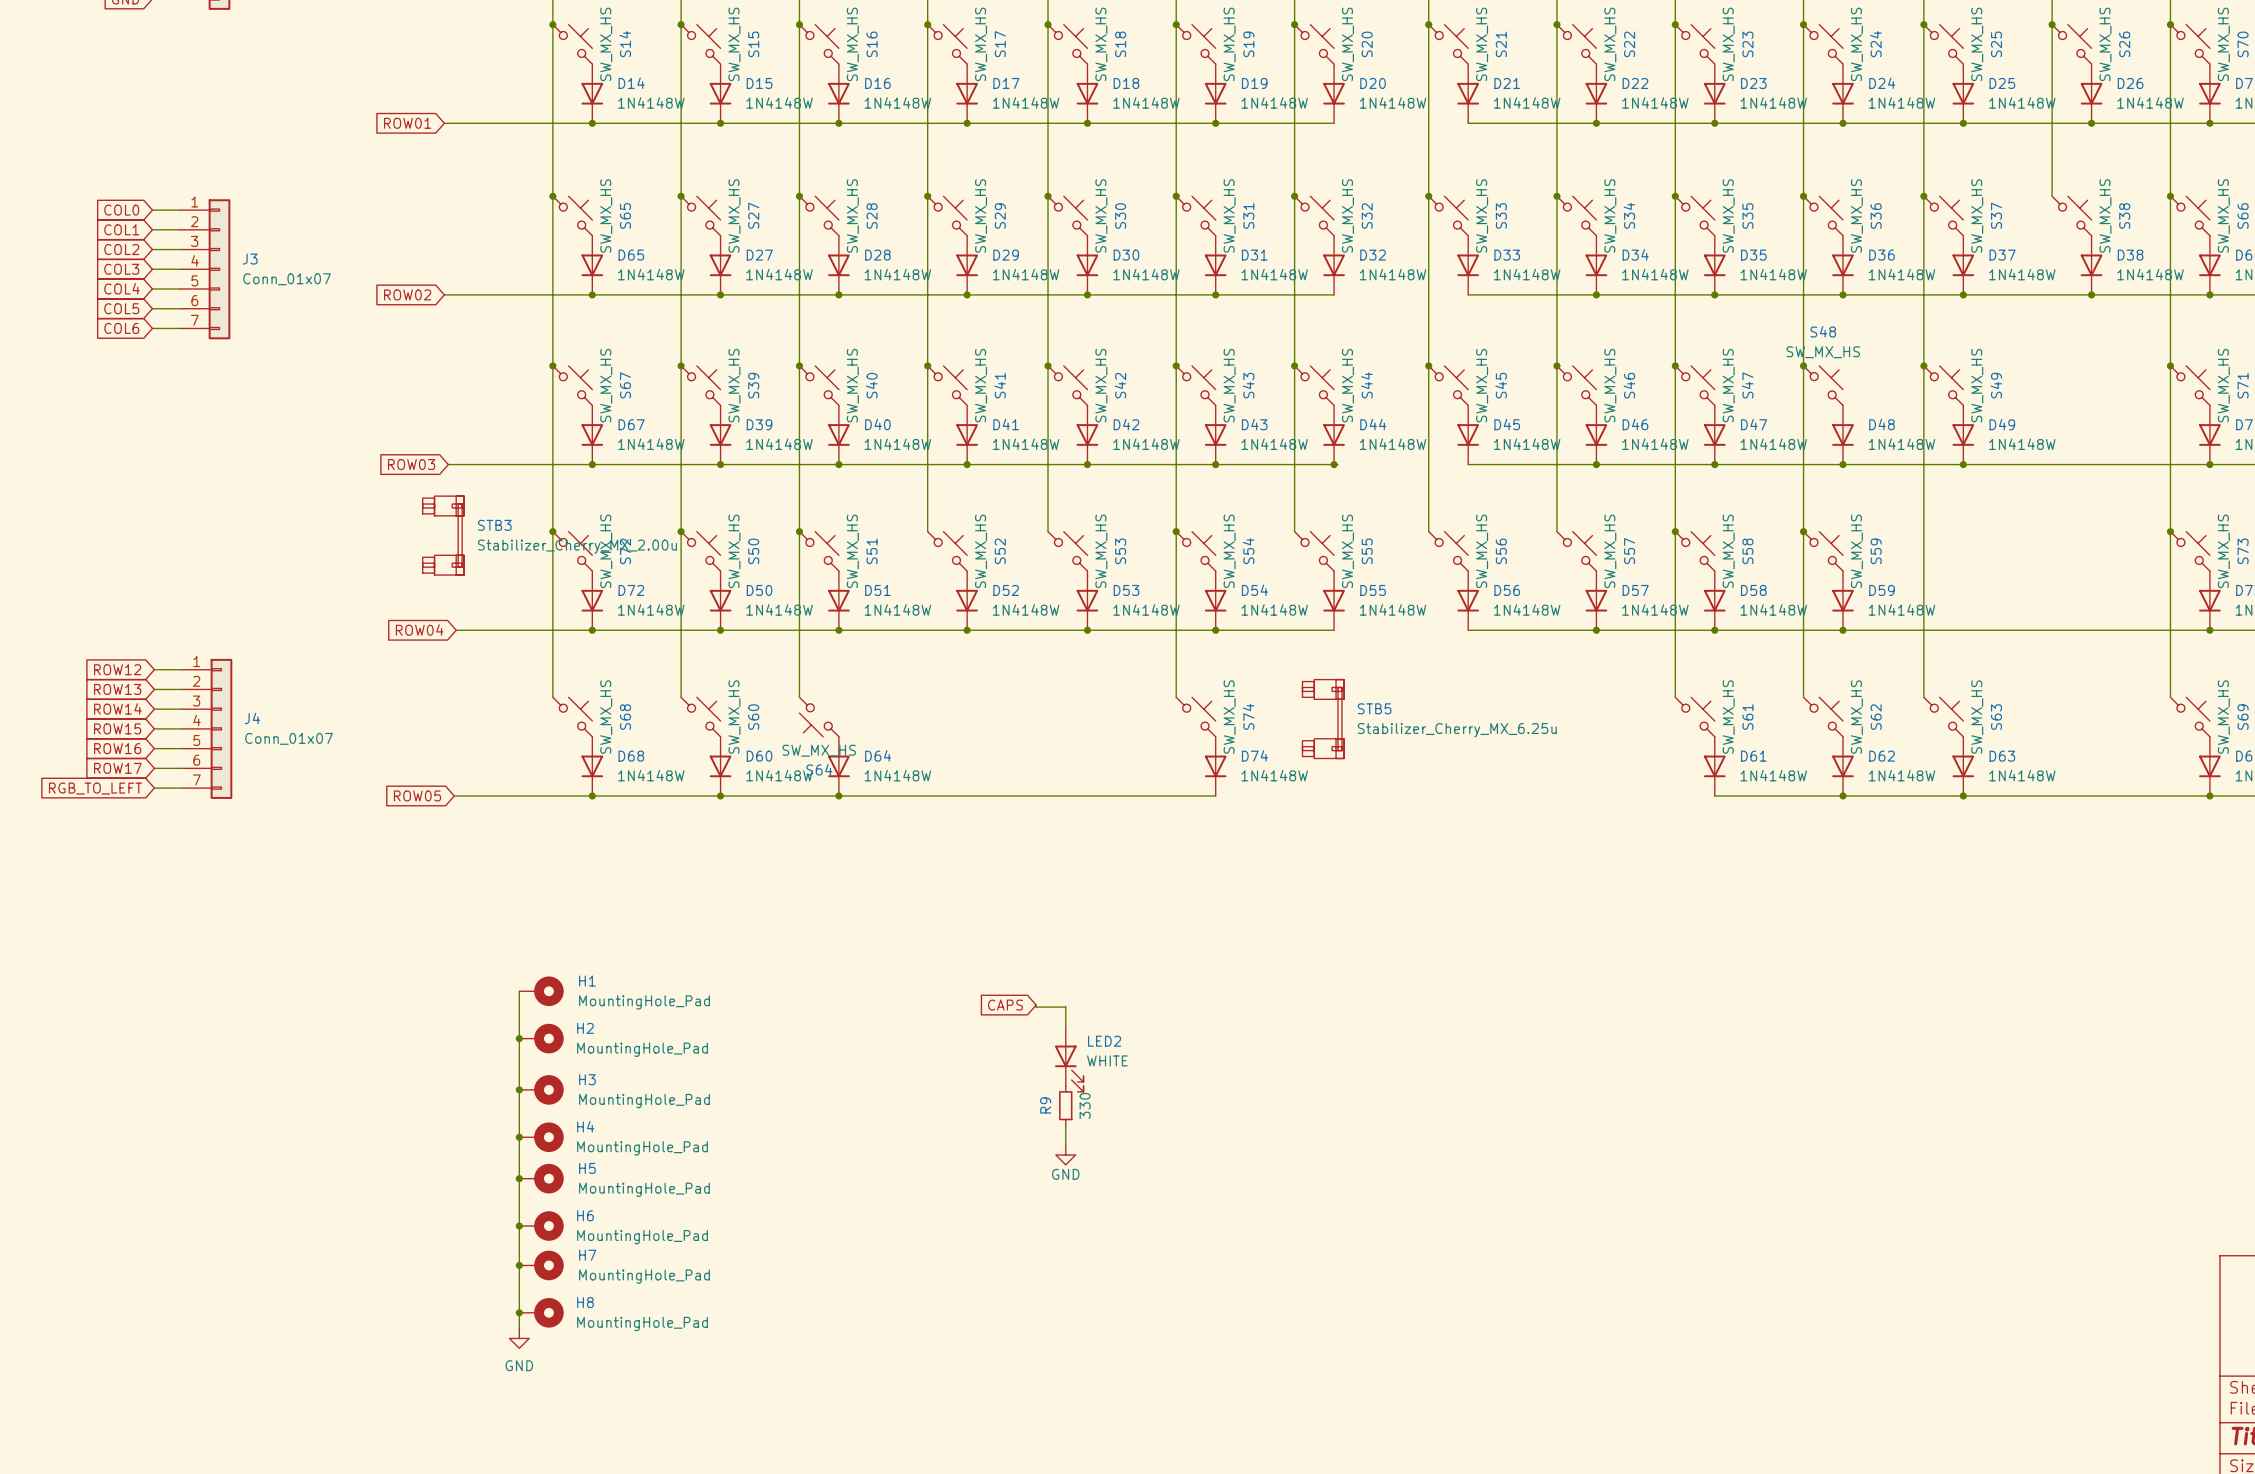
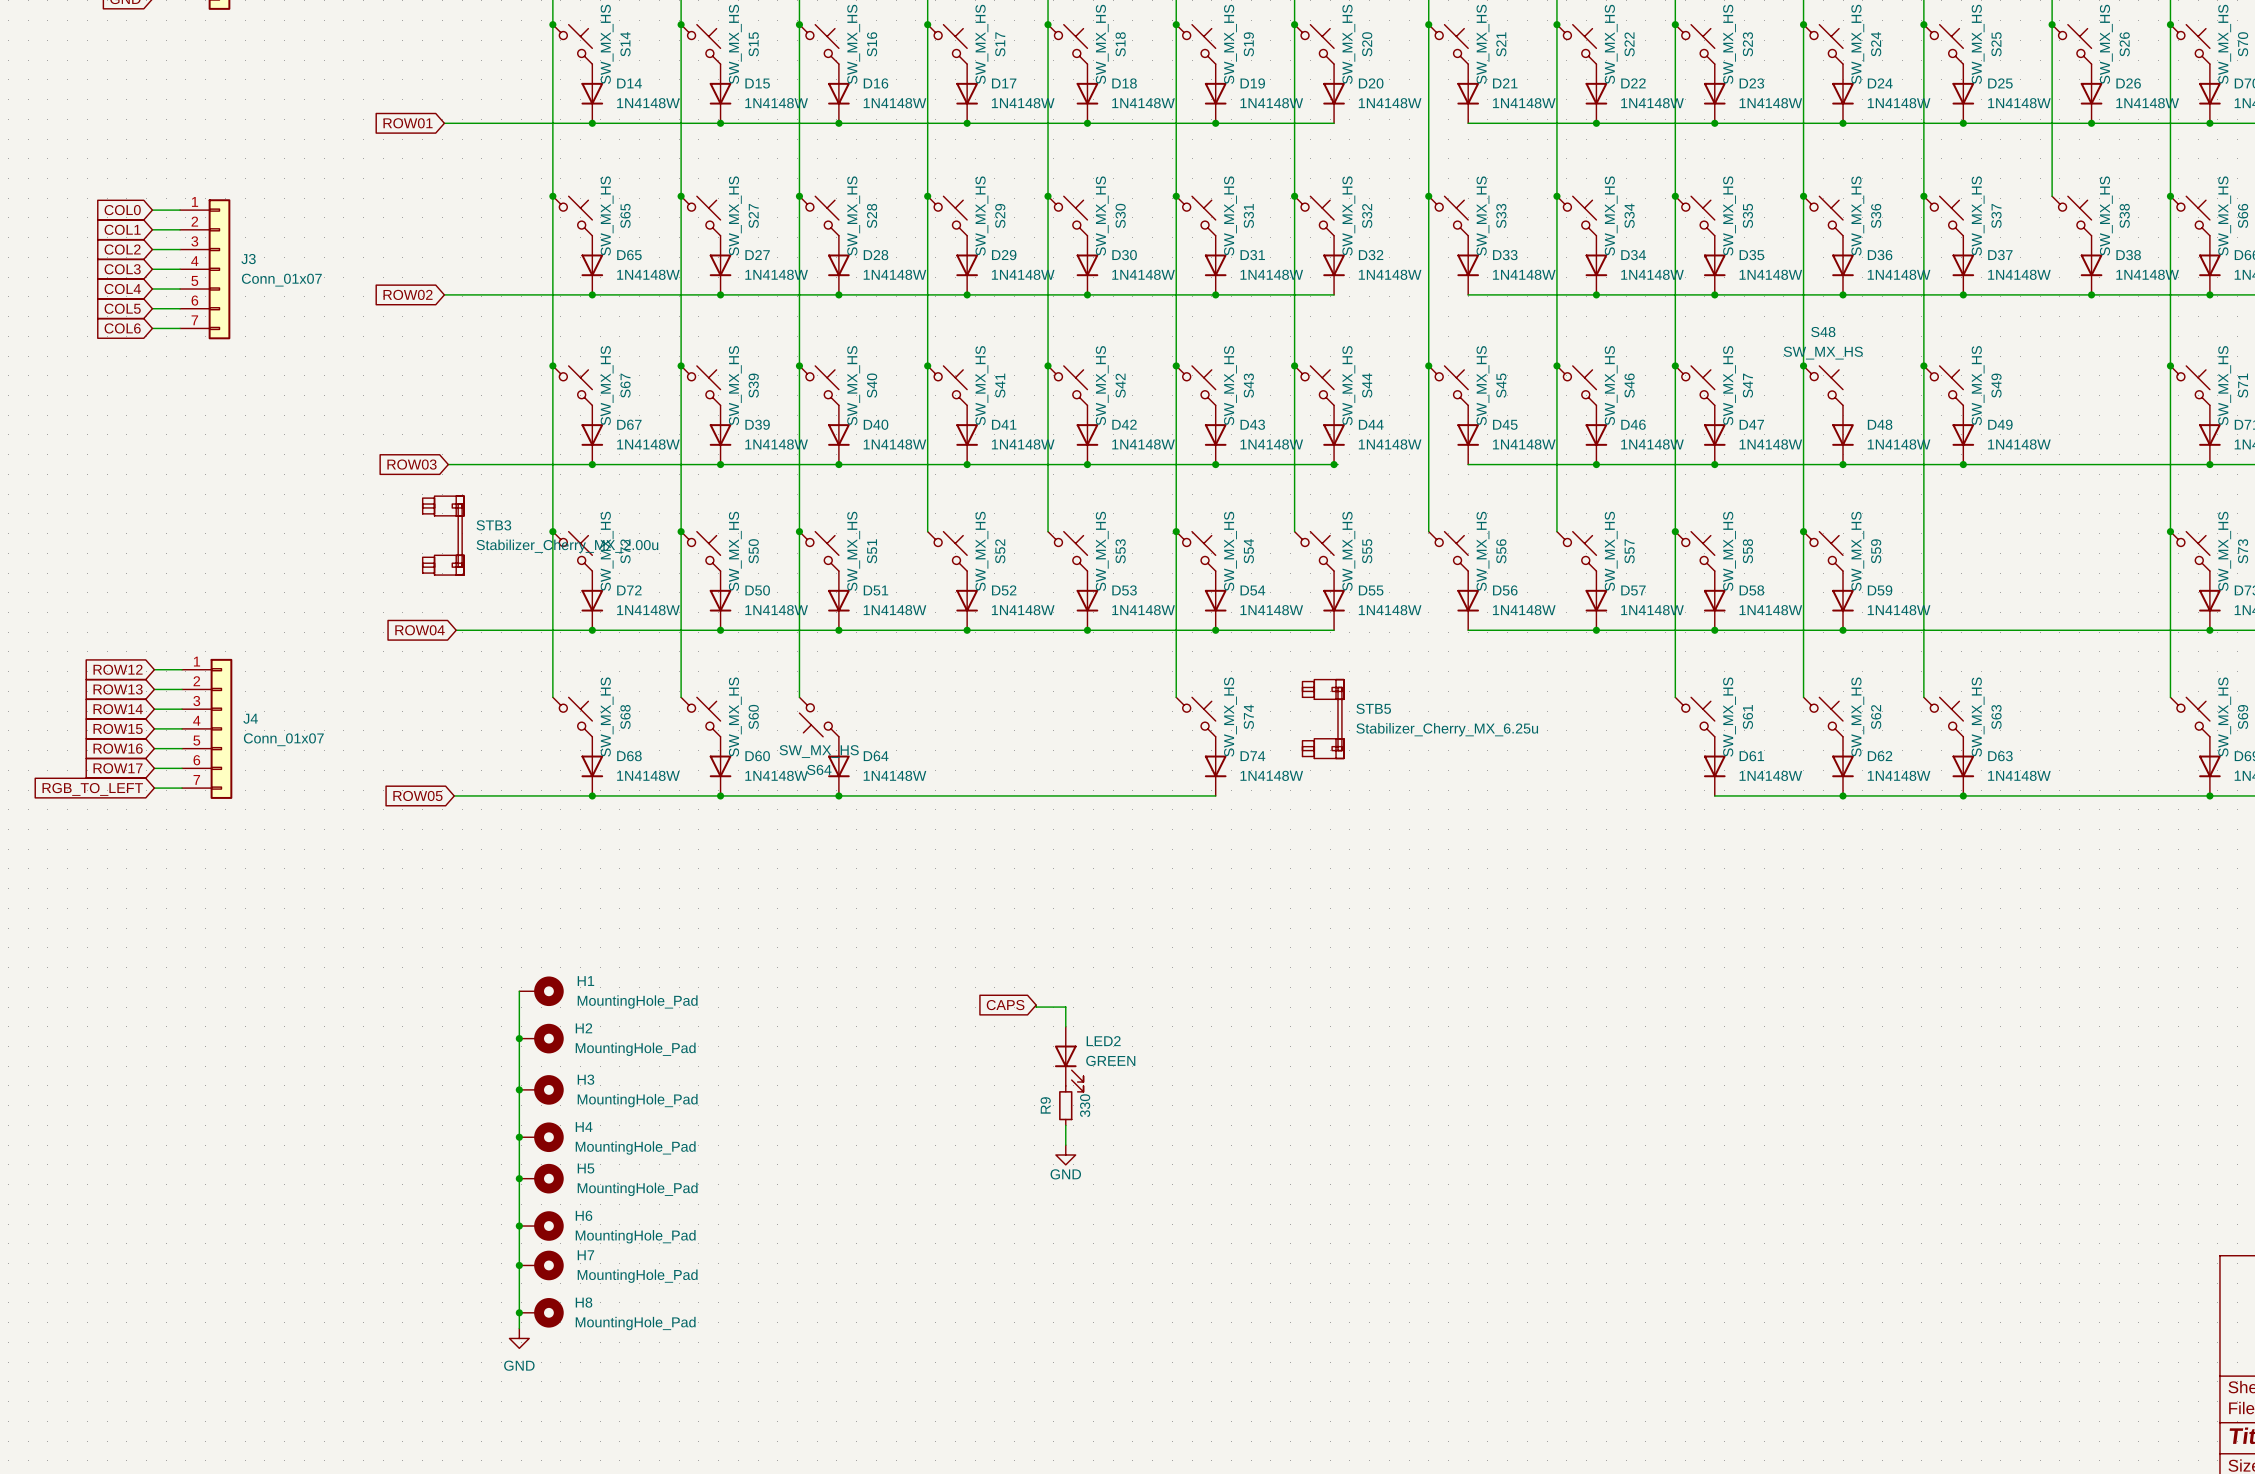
LED2 value: WHITE (1107, 1060) -> GREEN (1110, 1060)

